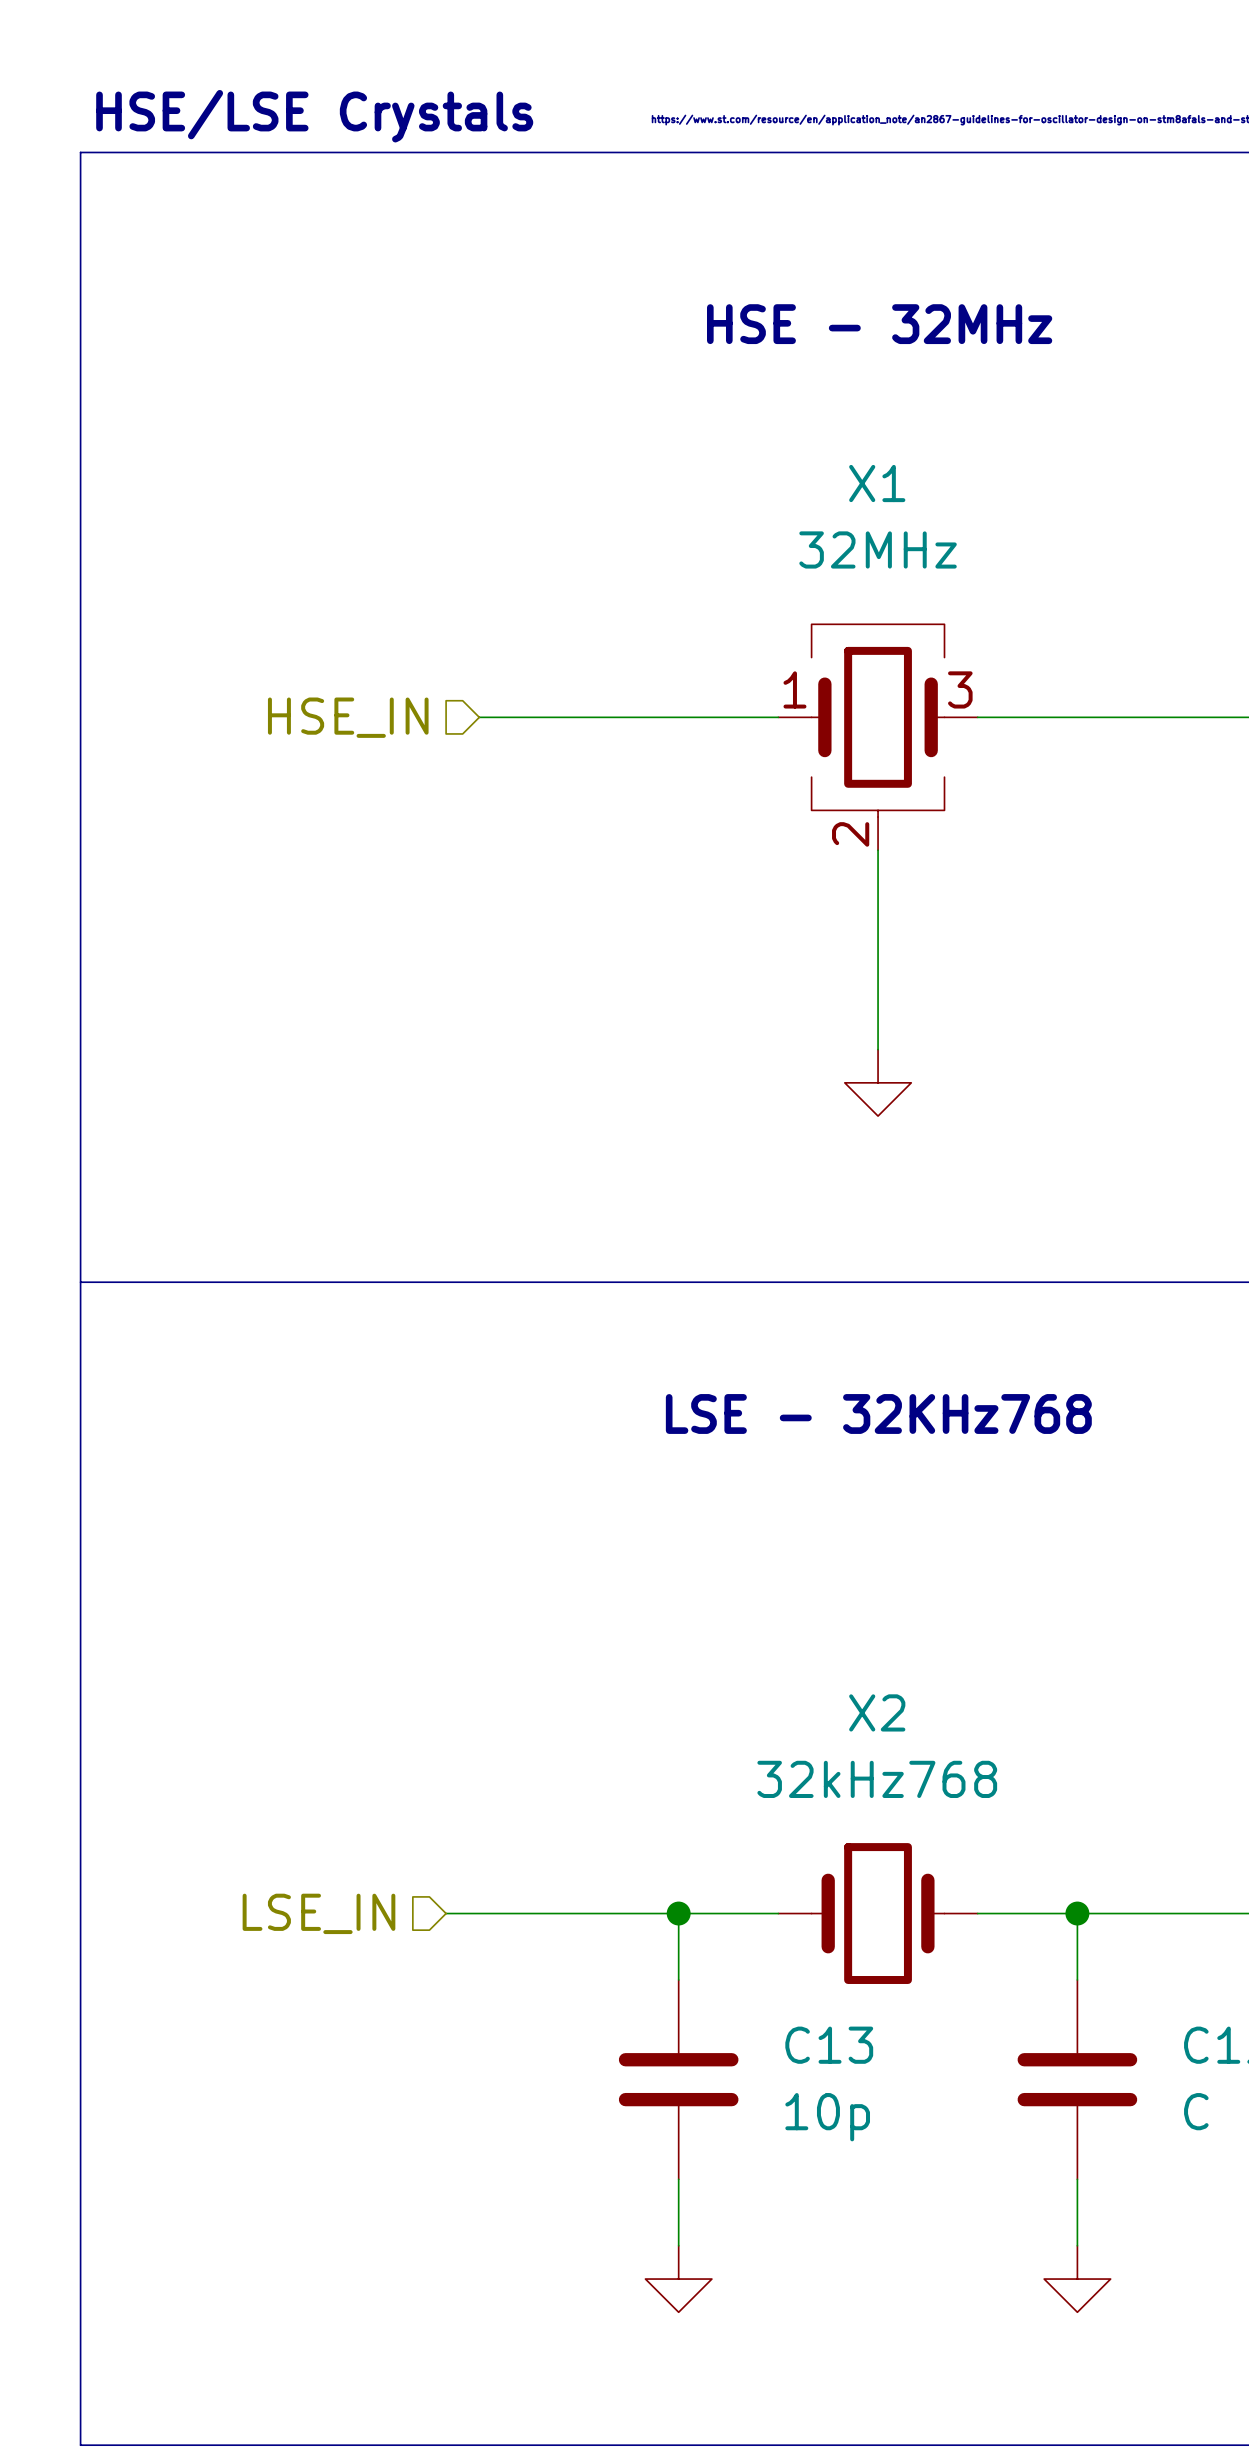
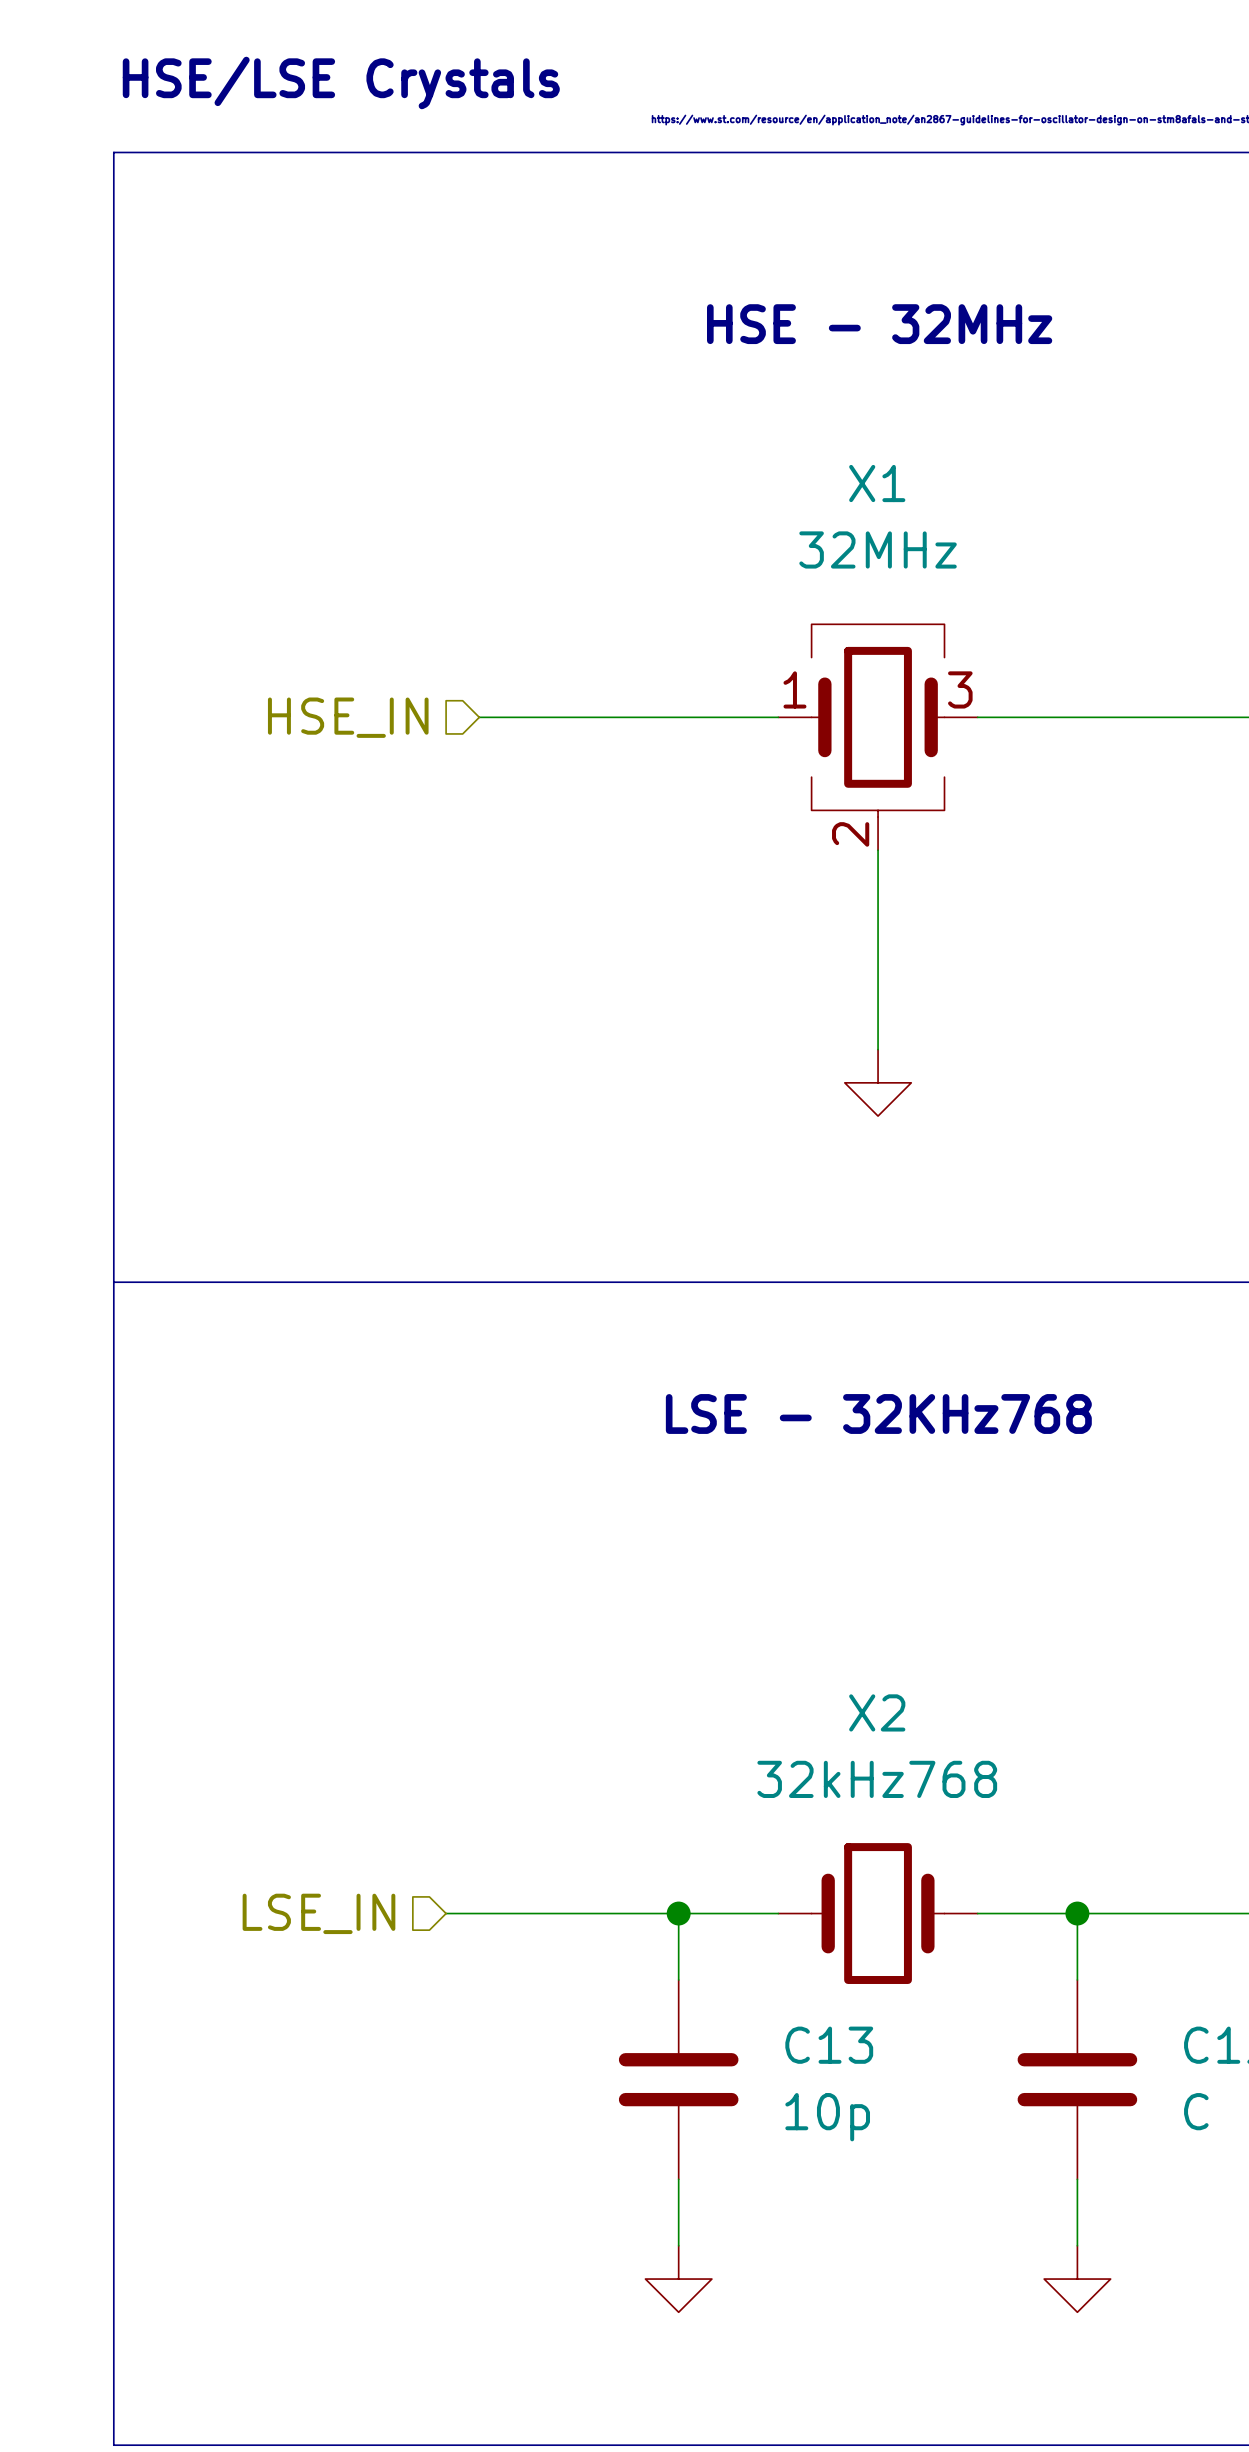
text position: HSE/LSE Crystals (314, 116) -> HSE/LSE Crystals (341, 82)
line: (113, 152) (80, 152) (80, 2445) (113, 2445) -> (113, 152) (113, 2445)
line: (80, 1282) (113, 1282) -> none

